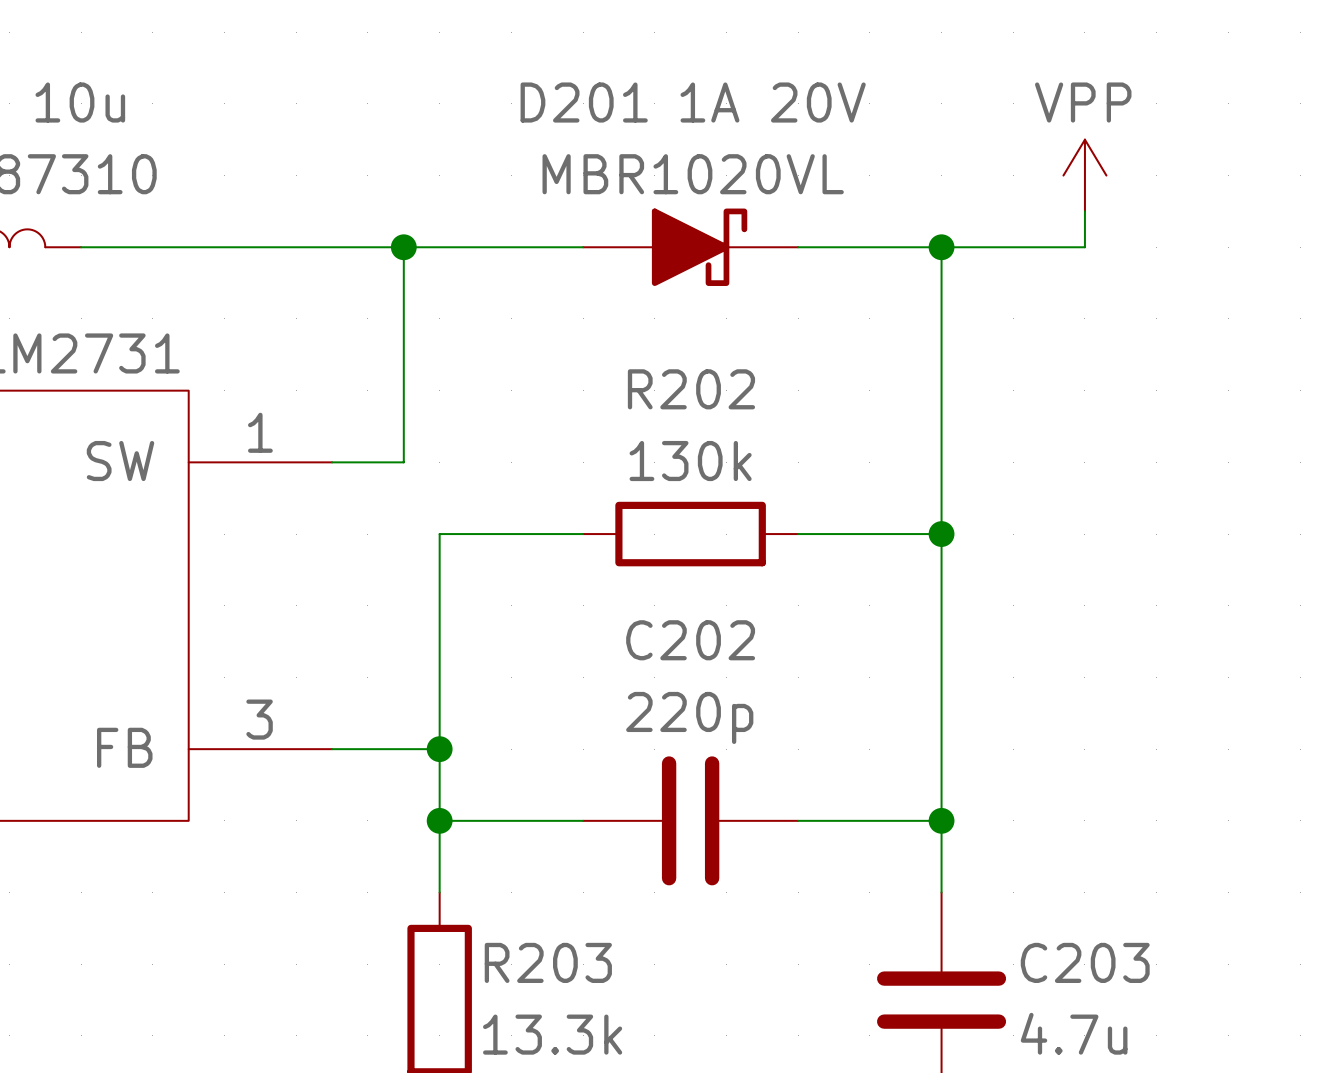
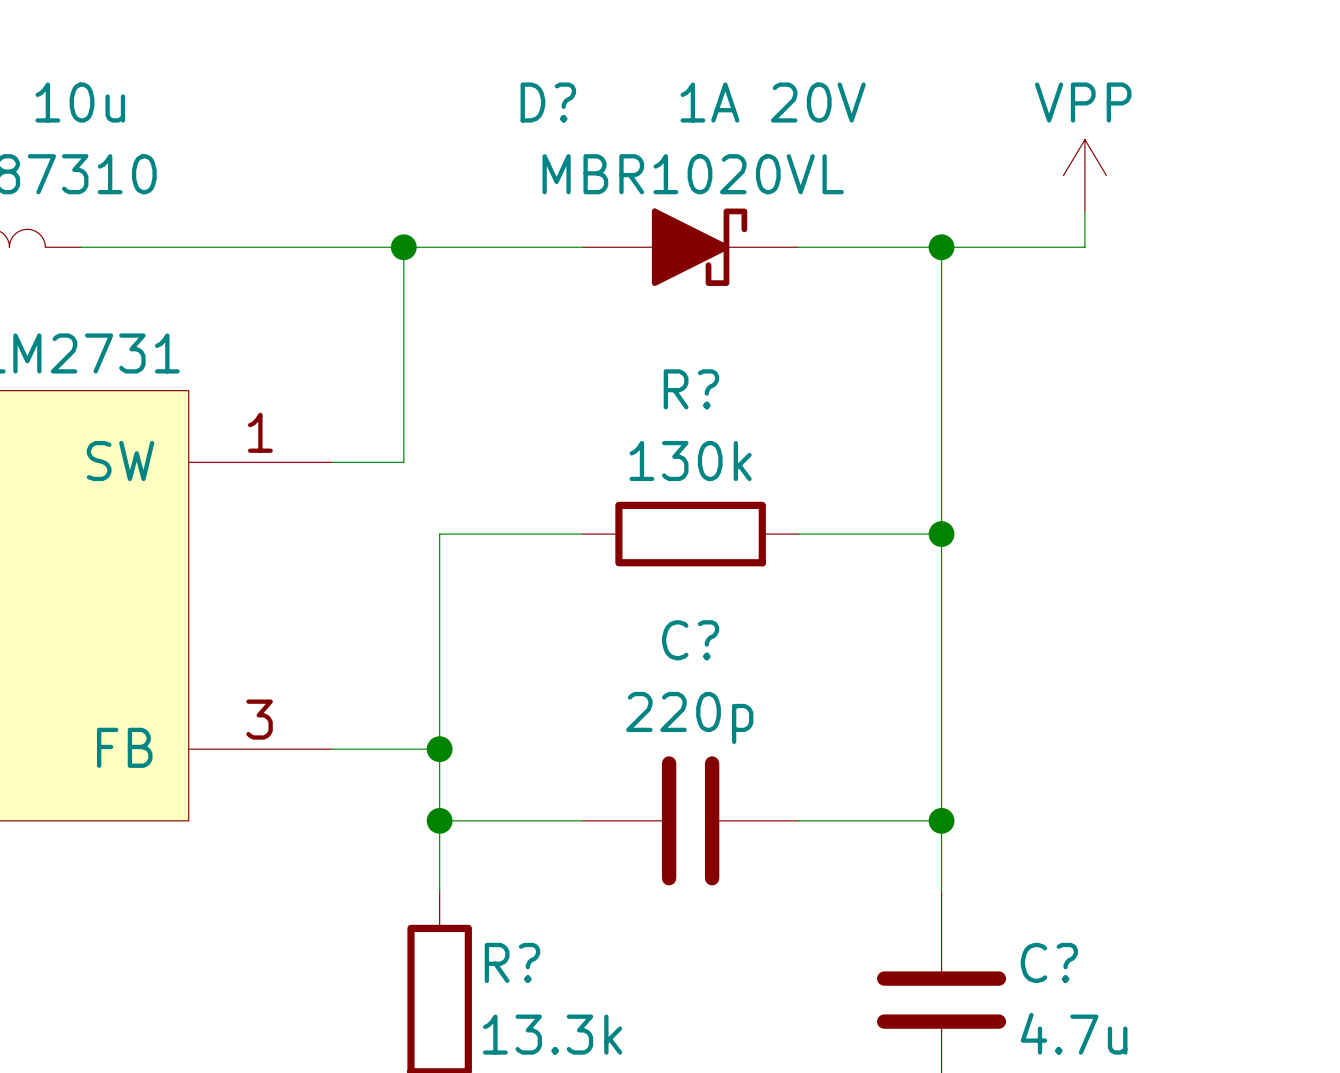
D201 name: D201 (584, 102) -> D? (548, 102)
R202 name: R202 (691, 389) -> R? (691, 389)
C202 name: C202 (690, 640) -> C? (690, 640)
R203 name: R203 (548, 962) -> R? (512, 962)
C203 name: C203 (1085, 962) -> C? (1049, 962)

